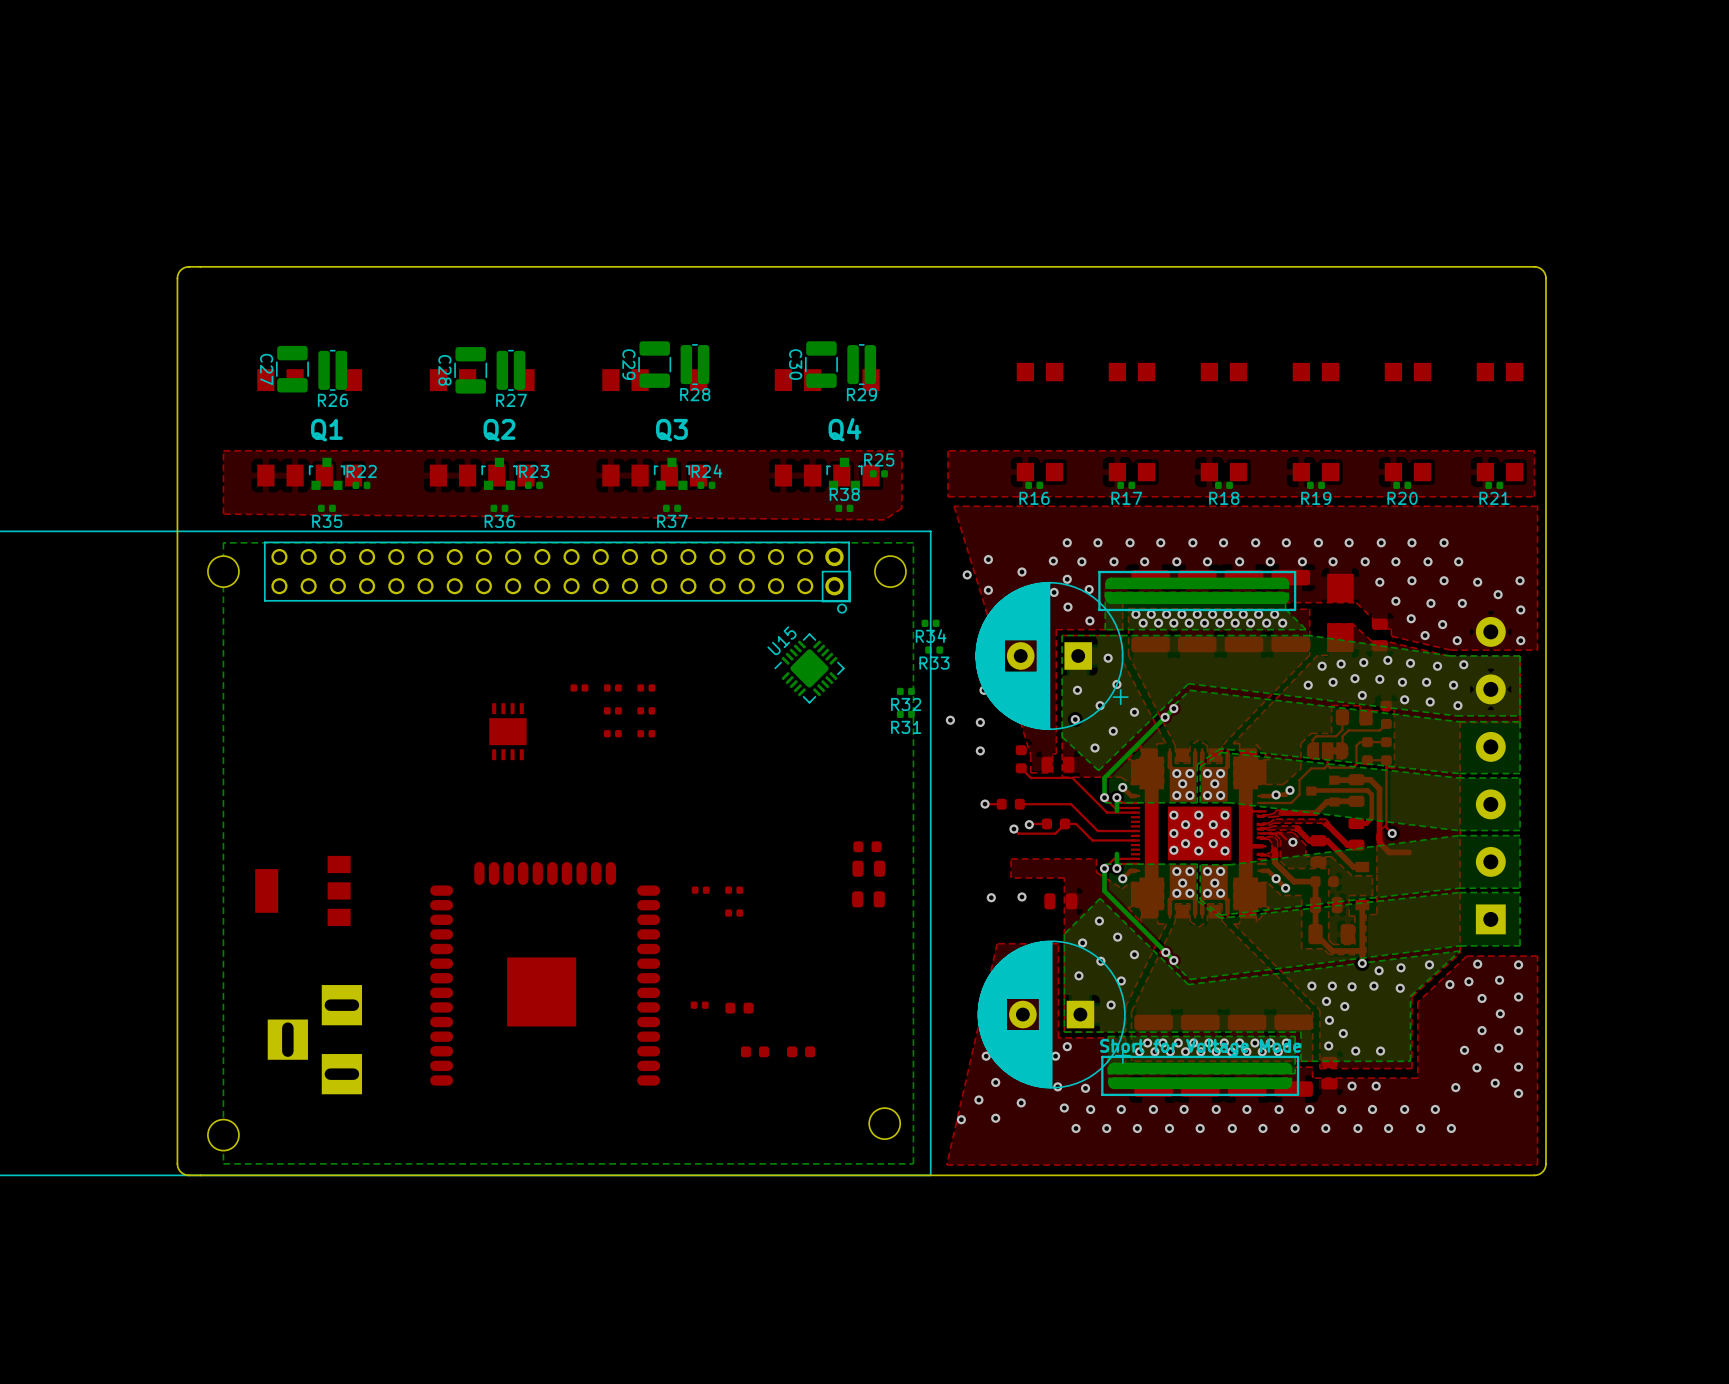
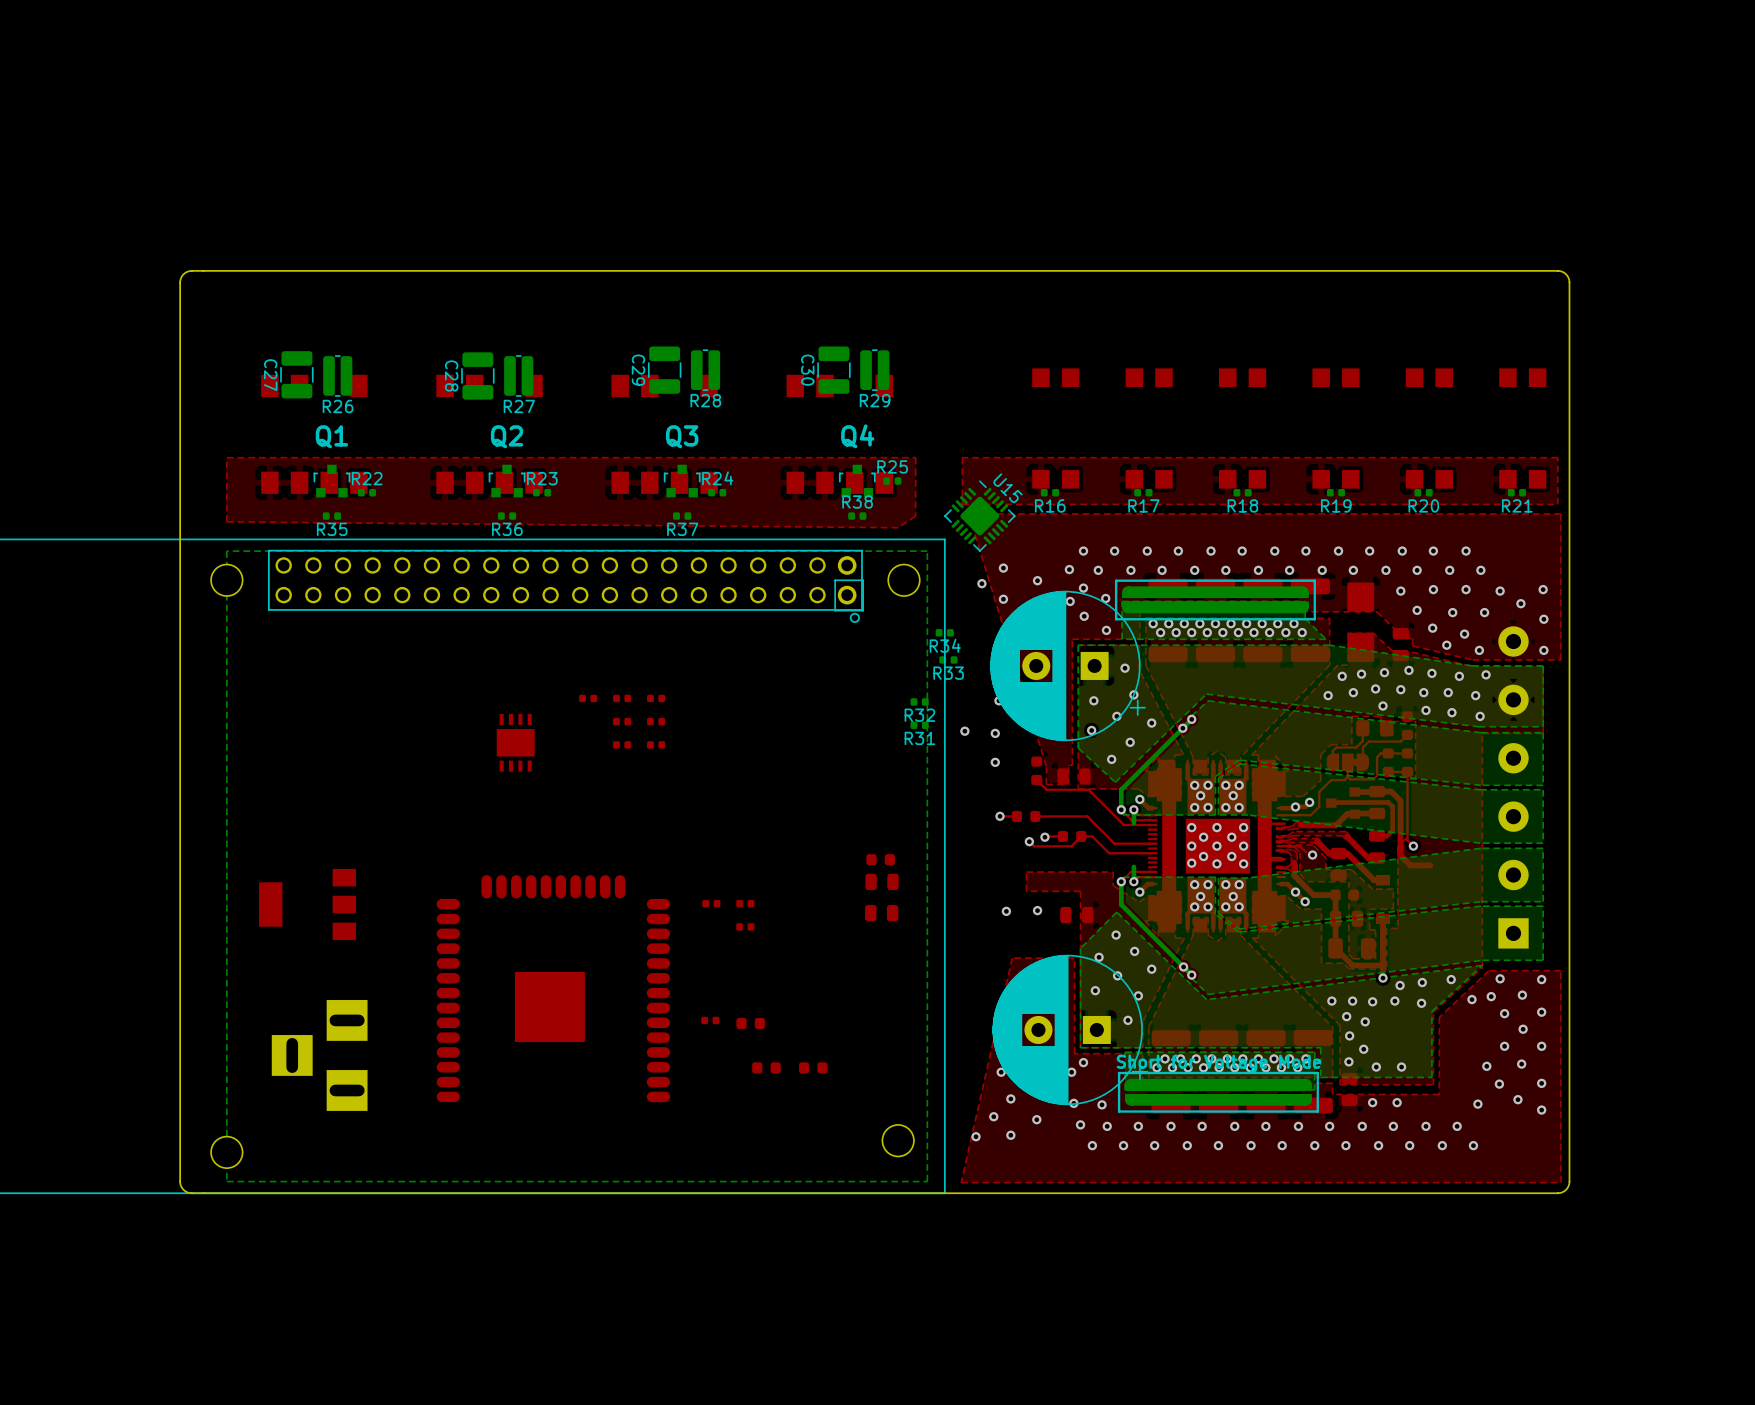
U15 rotation: 0° (809, 668) -> 90° clockwise (979, 516)
U15 position: (809, 668) -> (979, 516)

